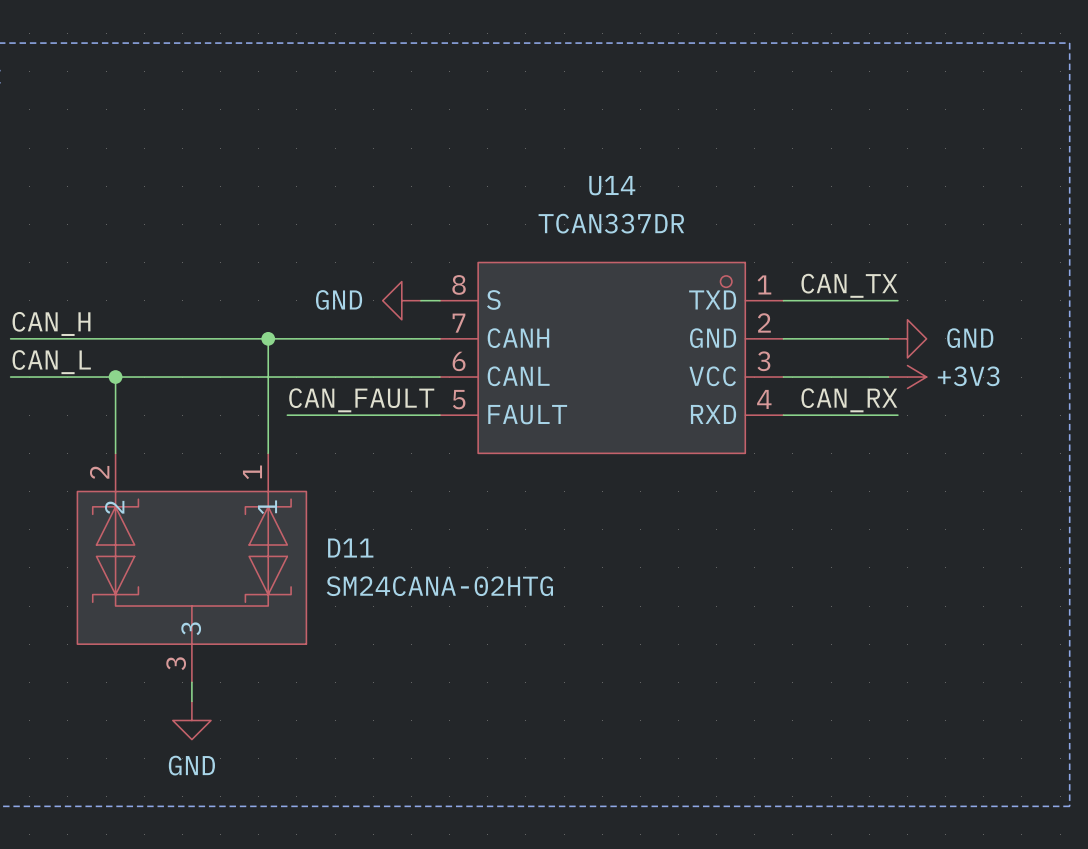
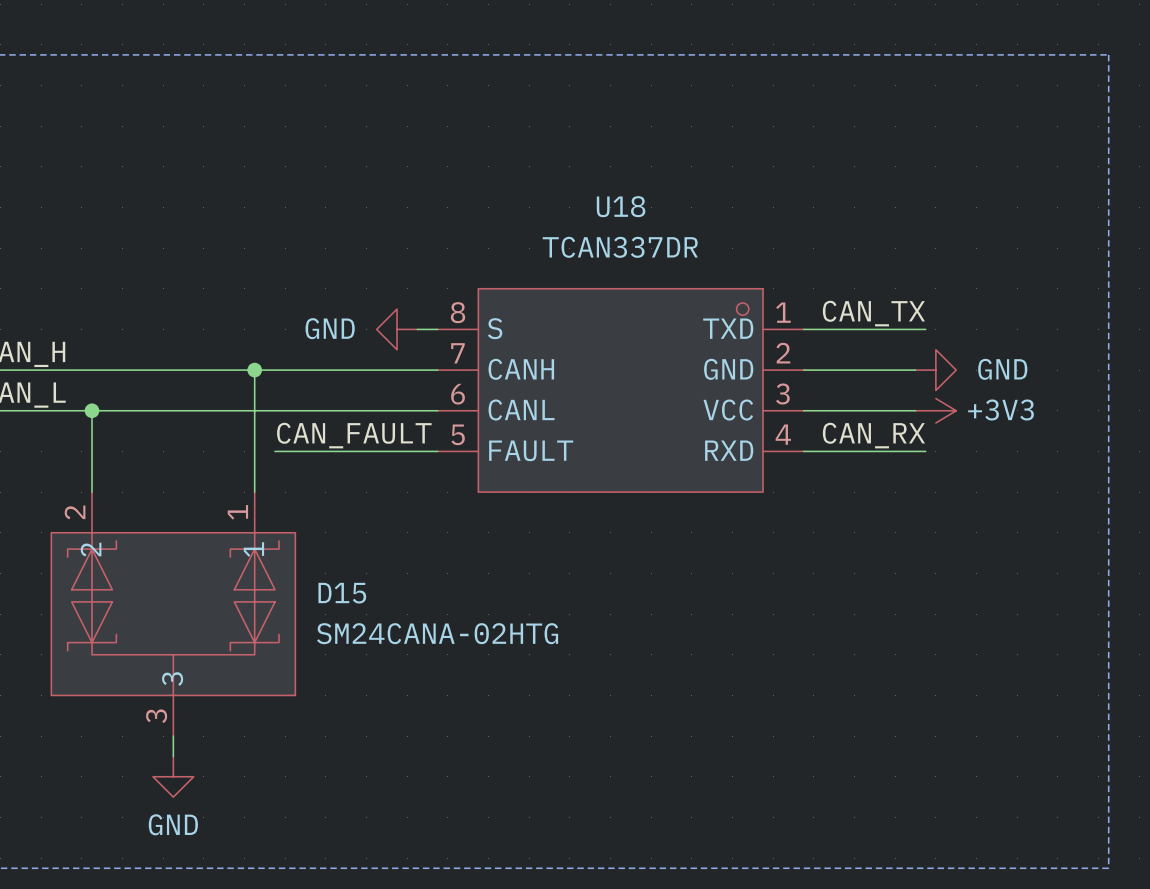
U14 name: U14 (612, 185) -> U18 (621, 206)
D11 name: D11 (350, 548) -> D15 (342, 593)

